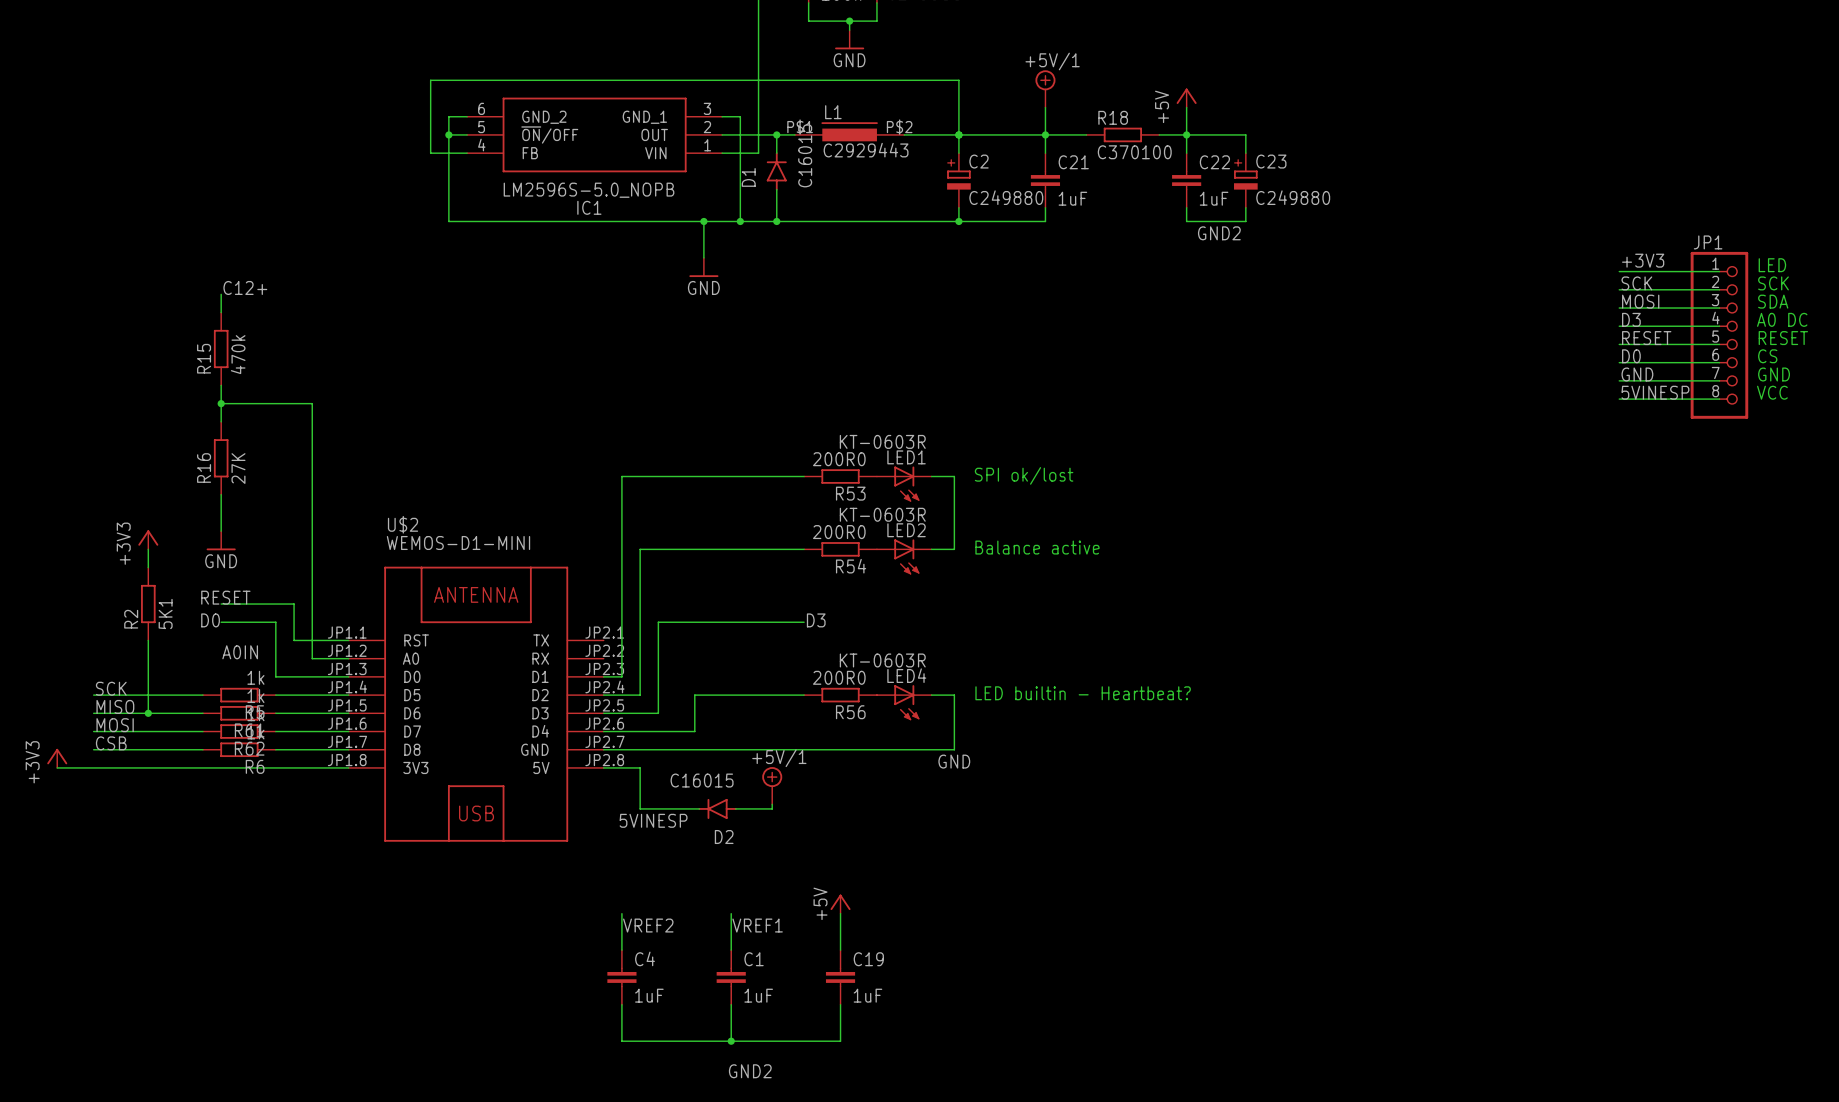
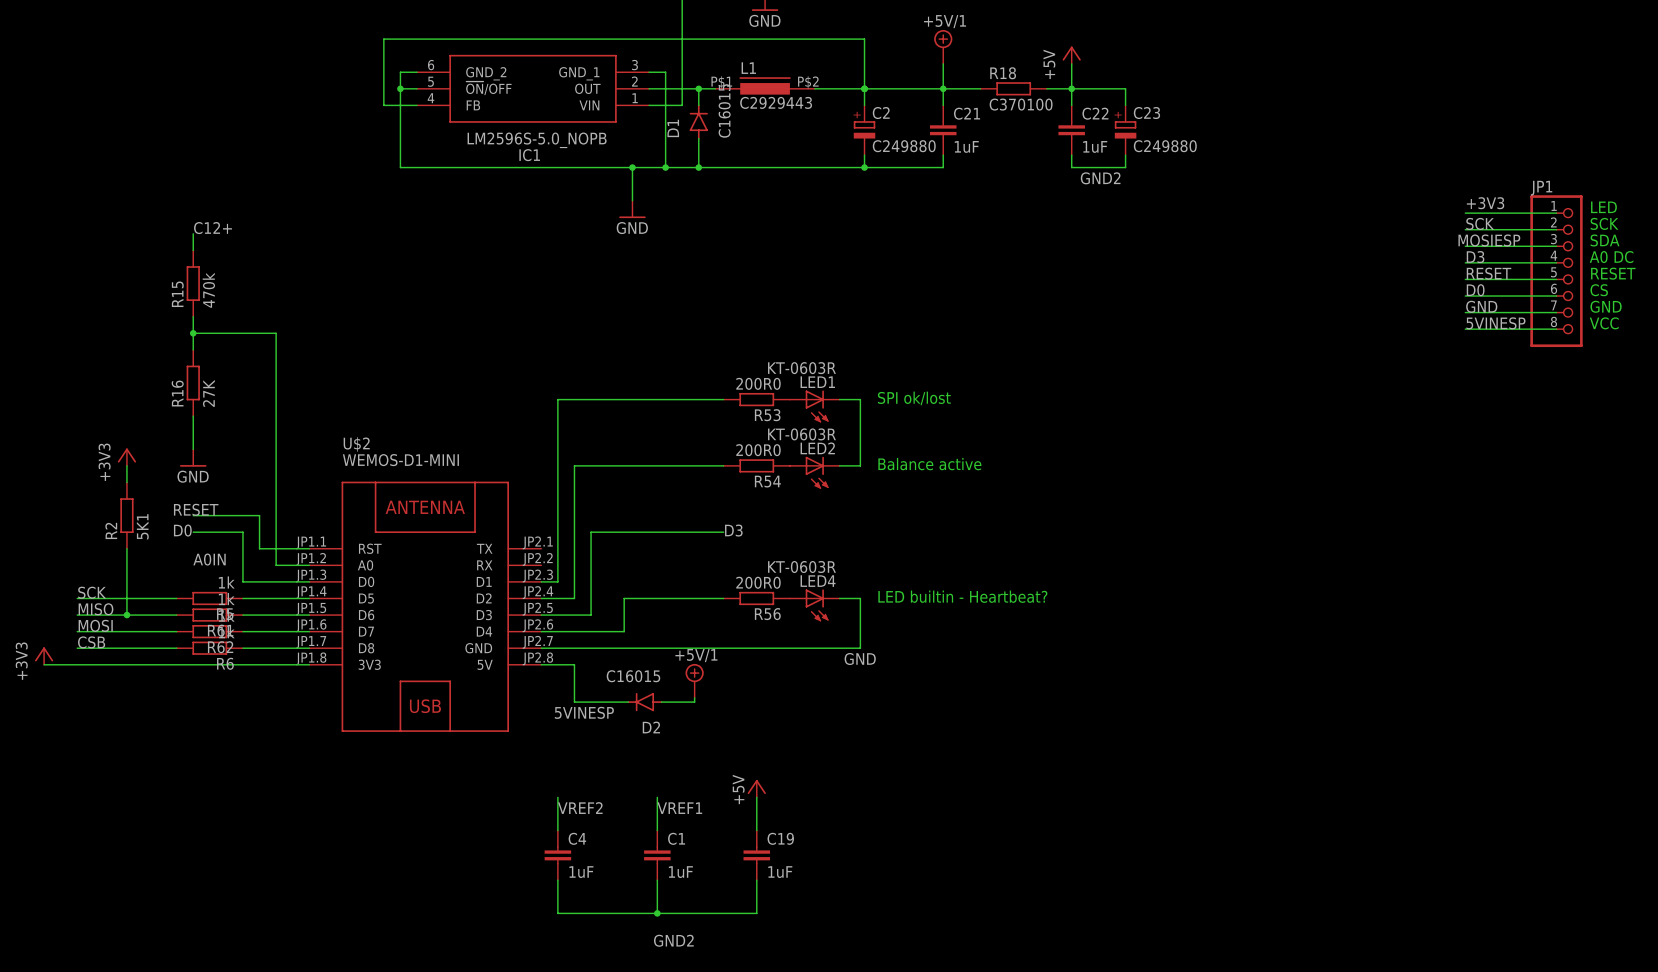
label: MOSI (1640, 301) -> MOSIESP (1489, 240)

